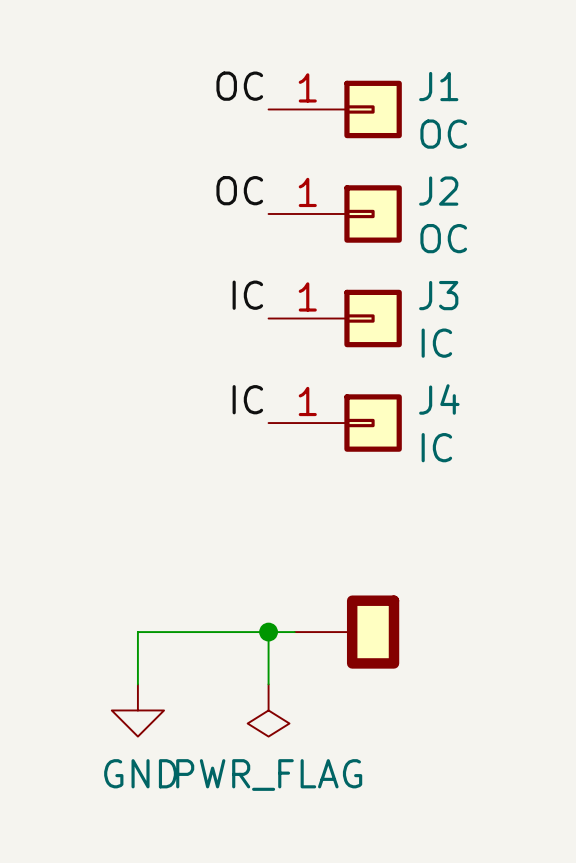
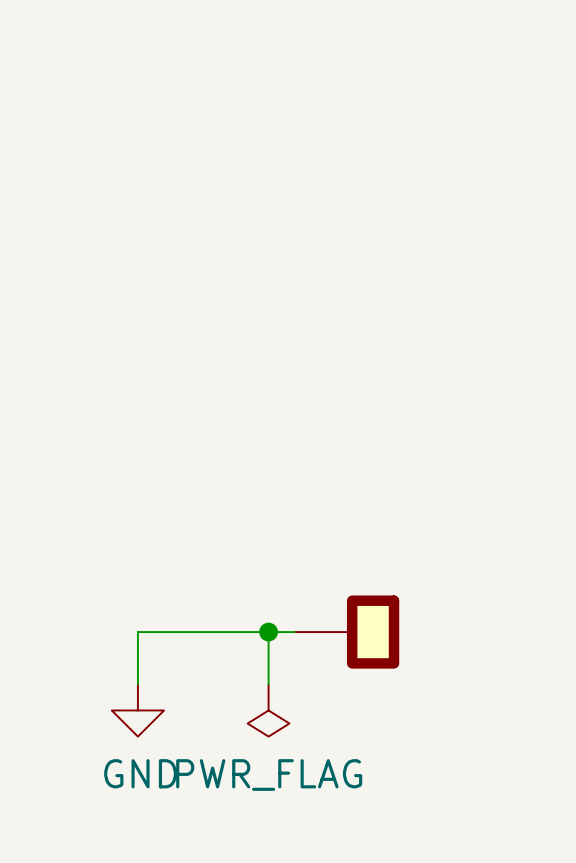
label: OC (239, 86) -> none
J1: OC (335, 109) -> none
label: OC (239, 190) -> none
J2: OC (335, 213) -> none
label: IC (247, 295) -> none
J3: IC (335, 318) -> none
label: IC (247, 399) -> none
J4: IC (335, 423) -> none

